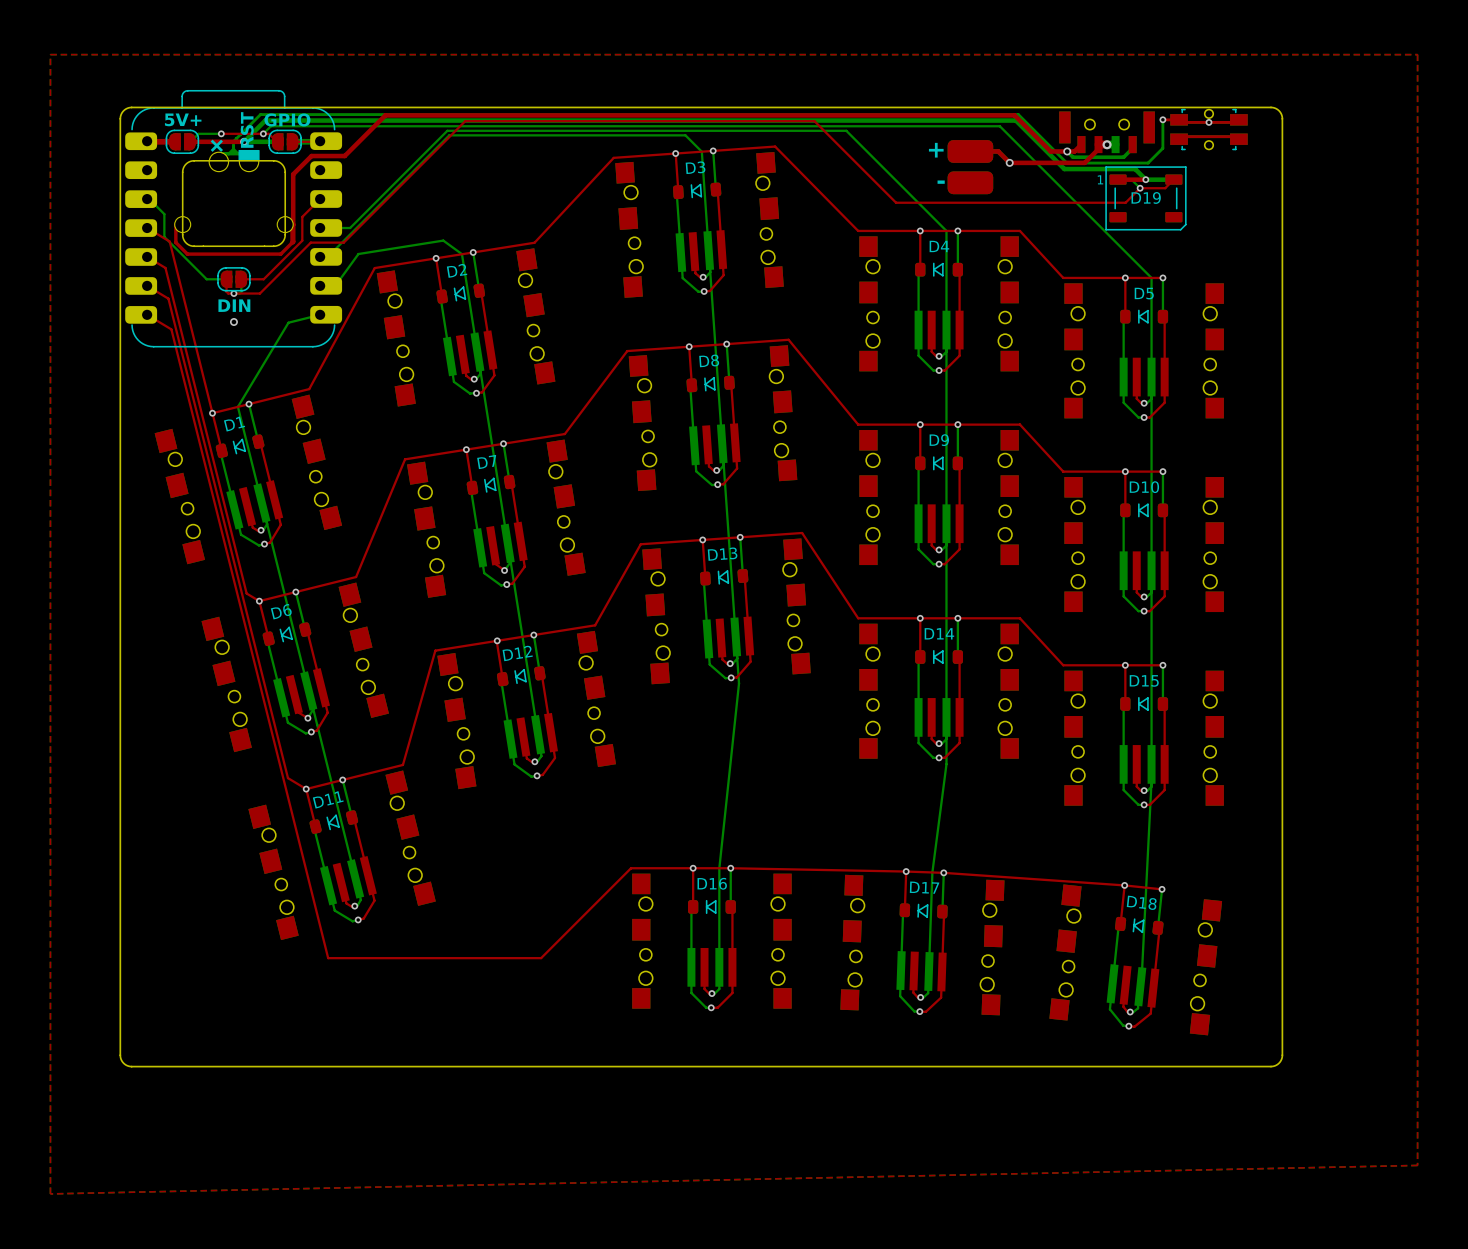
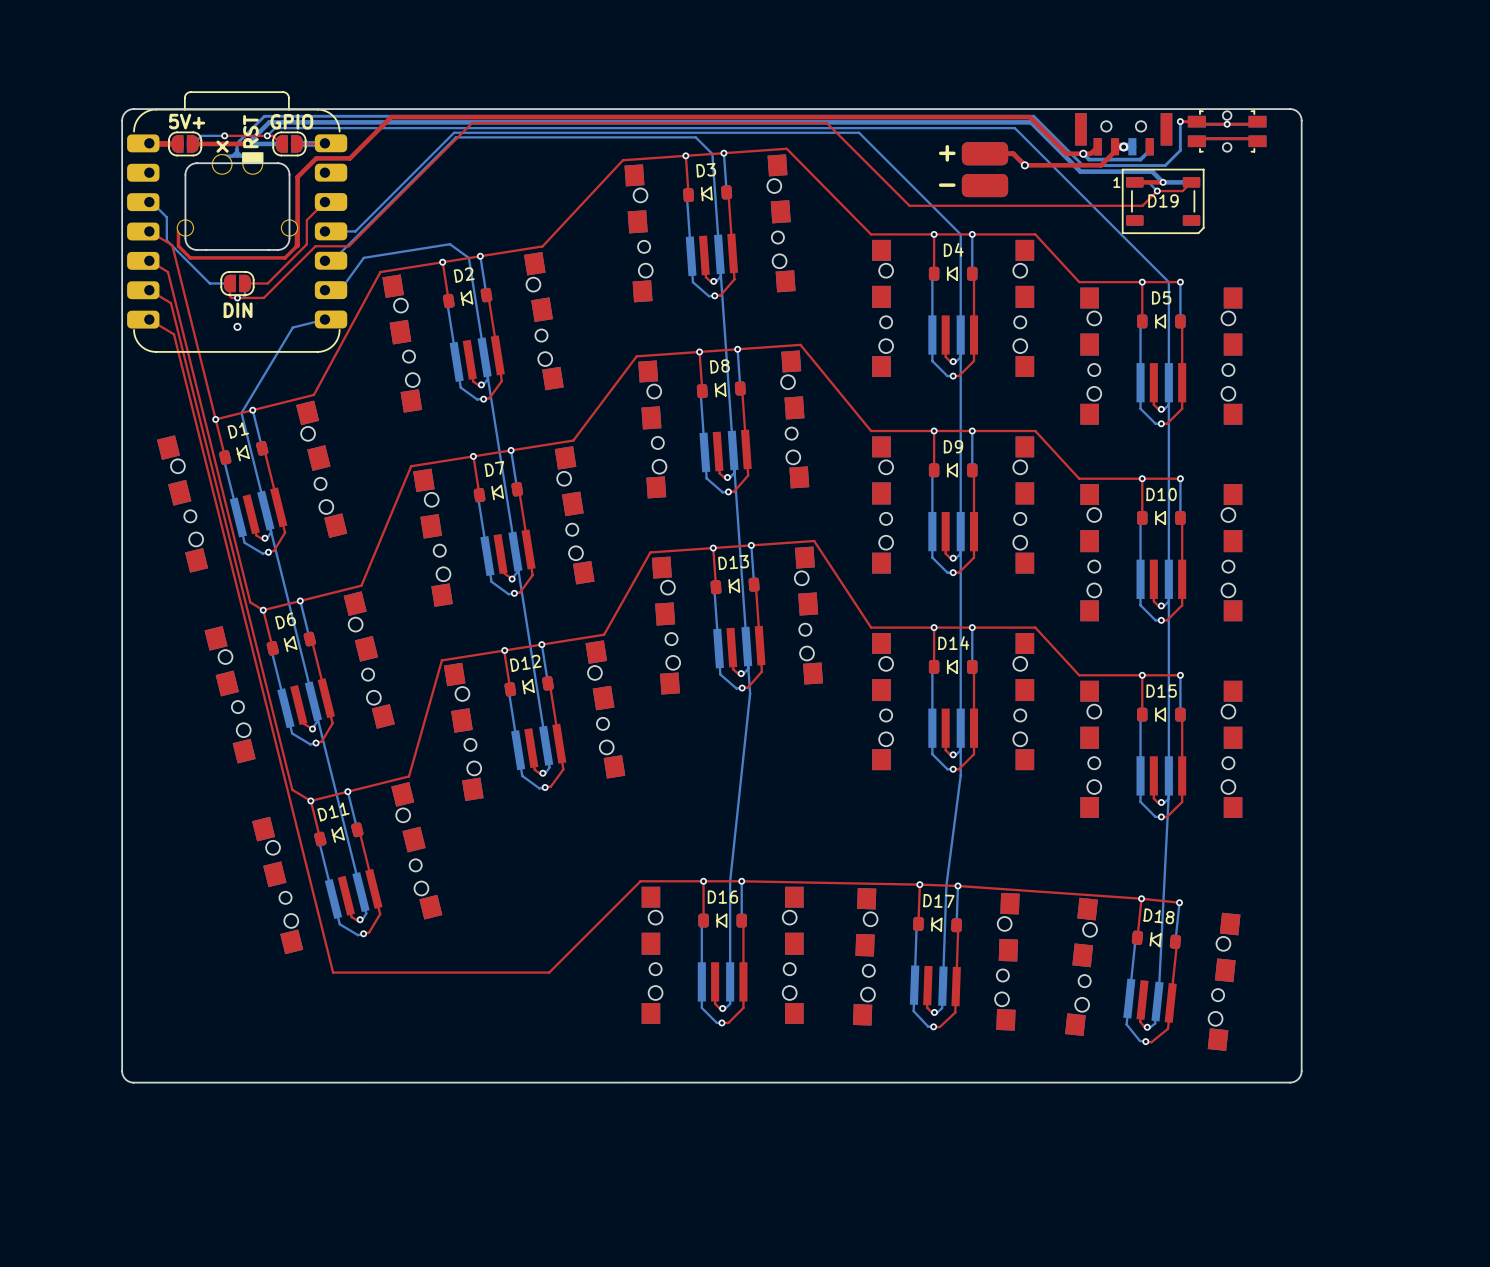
top zone outline: (50, 54) (1417, 54) (1417, 1165) (50, 1193) (50, 54) -> none

